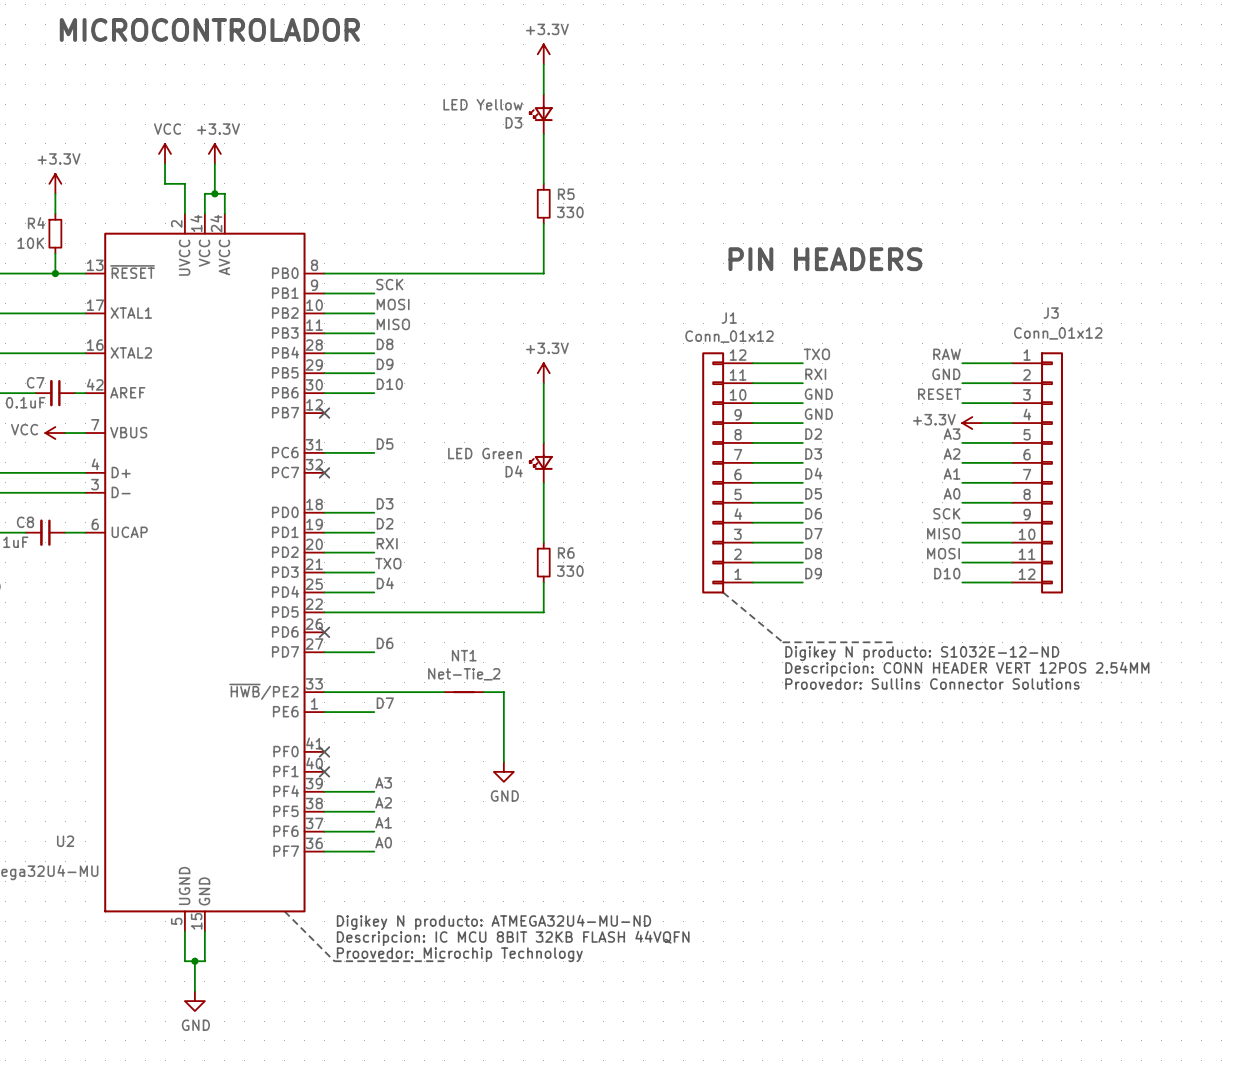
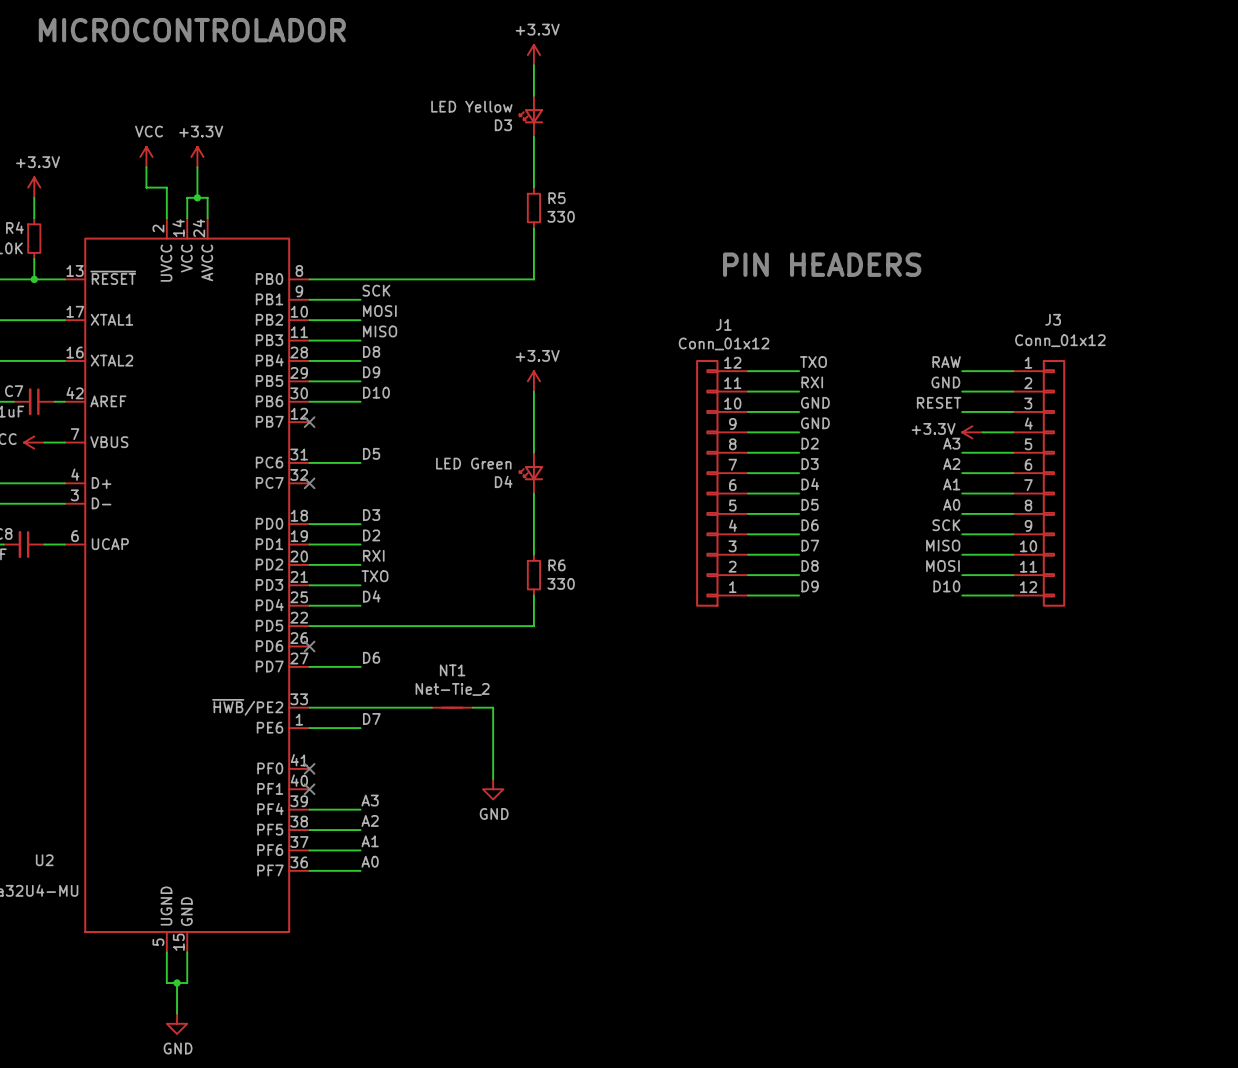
line: (723, 592) (782, 642) (892, 642) -> none
text: Digikey N producto: S1032E-12-ND (922, 653) -> none
text: Descripcion: CONN HEADER VERT 12POS 2.54MM (967, 669) -> none
text: Proovedor: Sullins Connector Solutions (932, 683) -> none
line: (284, 911) (334, 961) (444, 961) -> none
text: Digikey N producto: ATMEGA32U4-MU-ND (493, 922) -> none
text: Descripcion: IC MCU 8BIT 32KB FLASH 44VQFN (513, 938) -> none
text: Proovedor: Microchip Technology (459, 954) -> none

